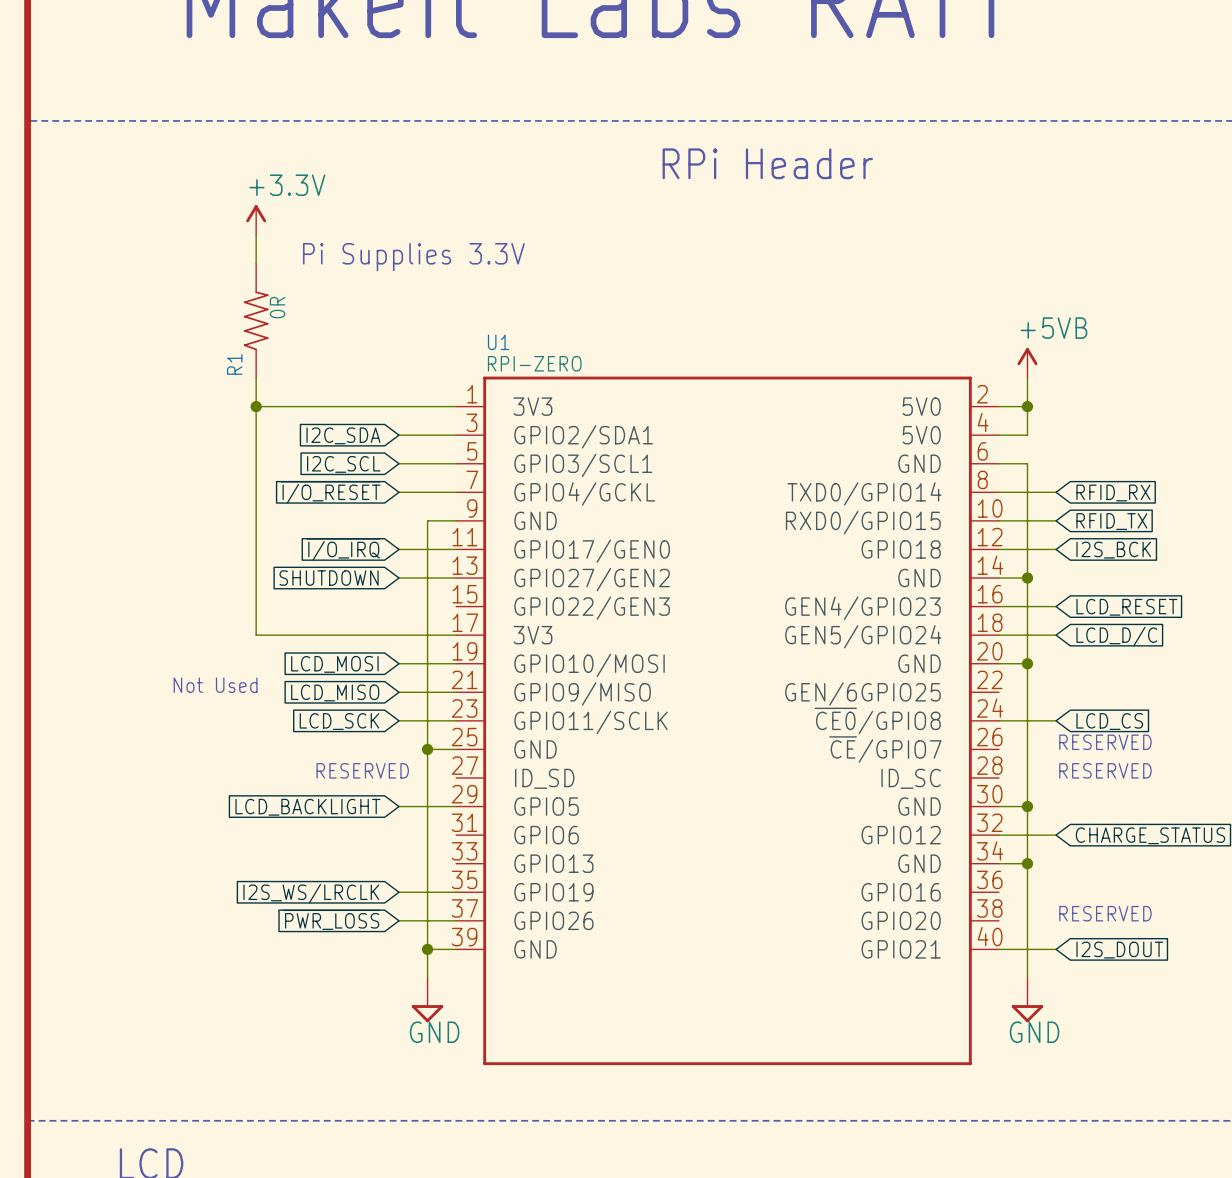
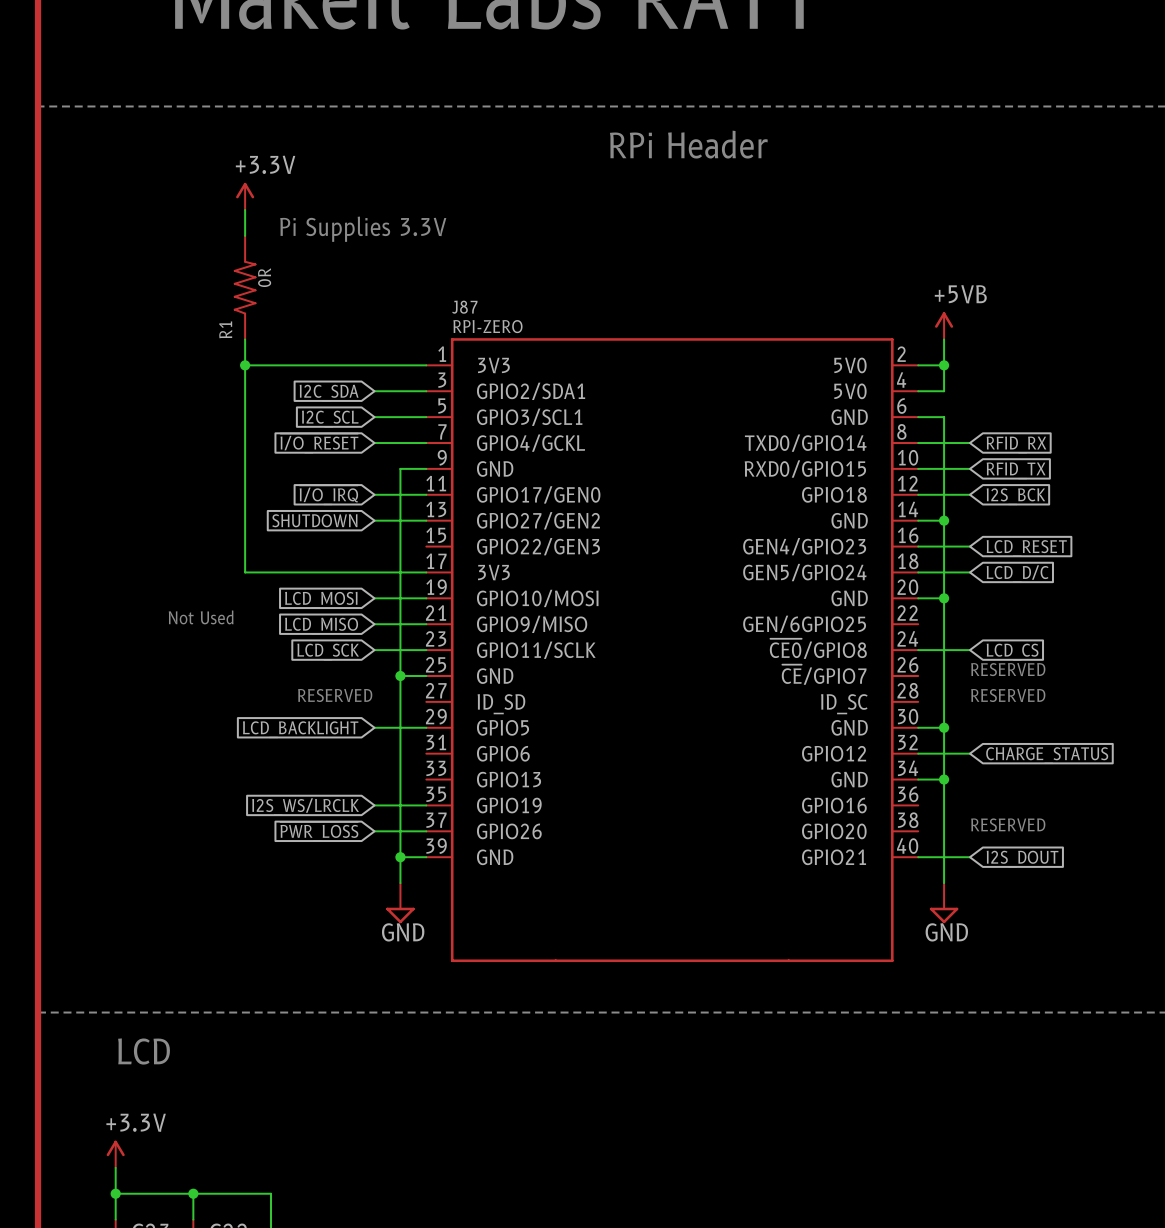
U1: RPI-ZERO (727, 720) -> none
J87: none -> RPI-ZERO (672, 650)

